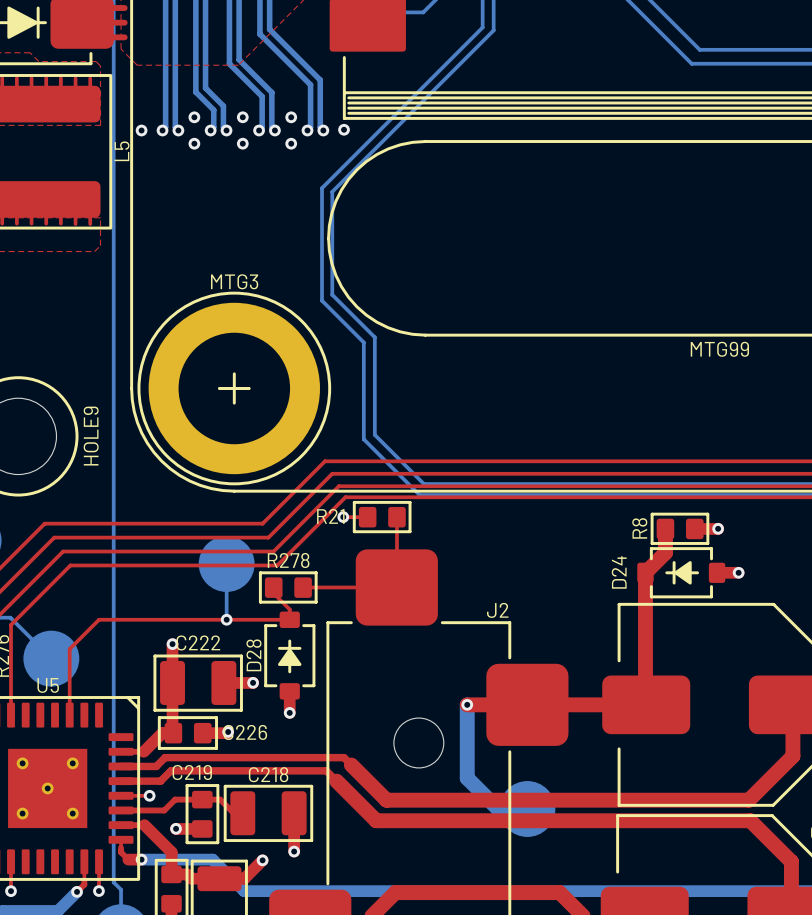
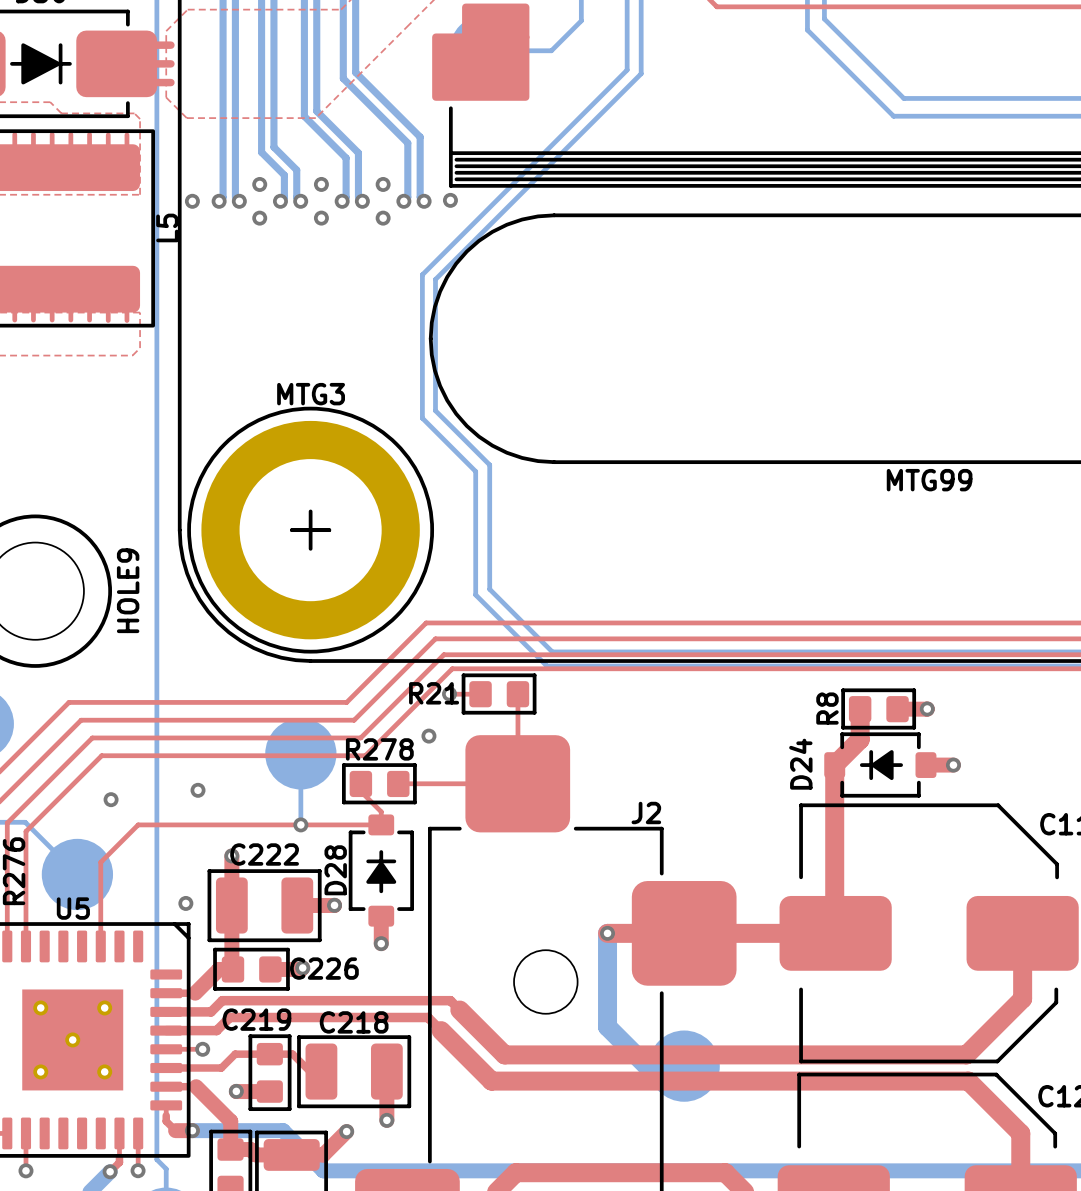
via: none -> (428, 736)
via: none -> (198, 790)
via: none -> (111, 799)
via: none -> (185, 903)

